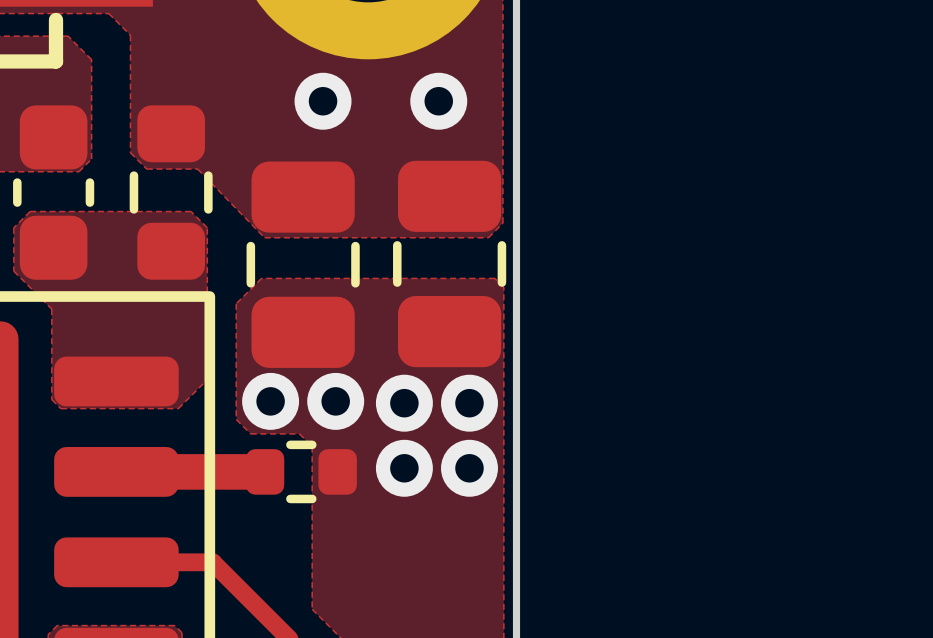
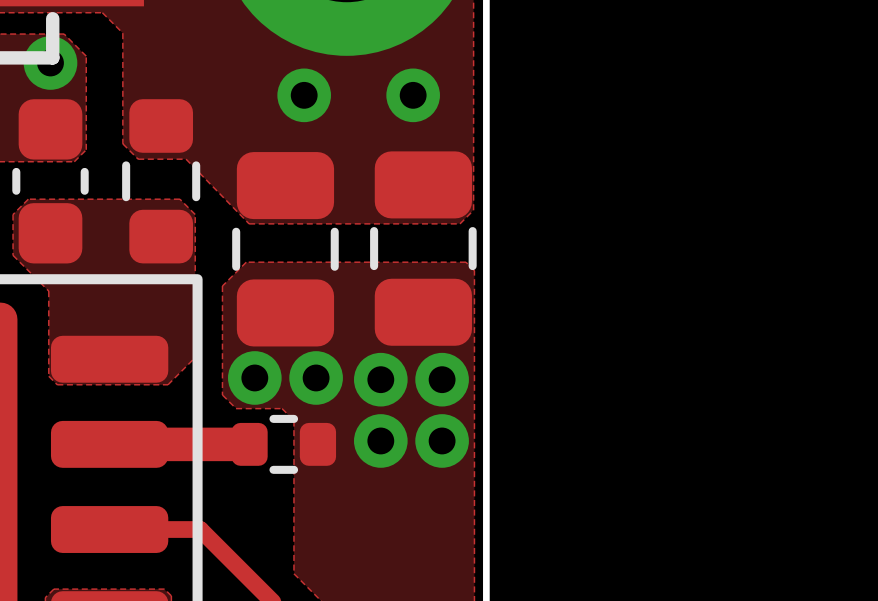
via: none -> (50, 62)

